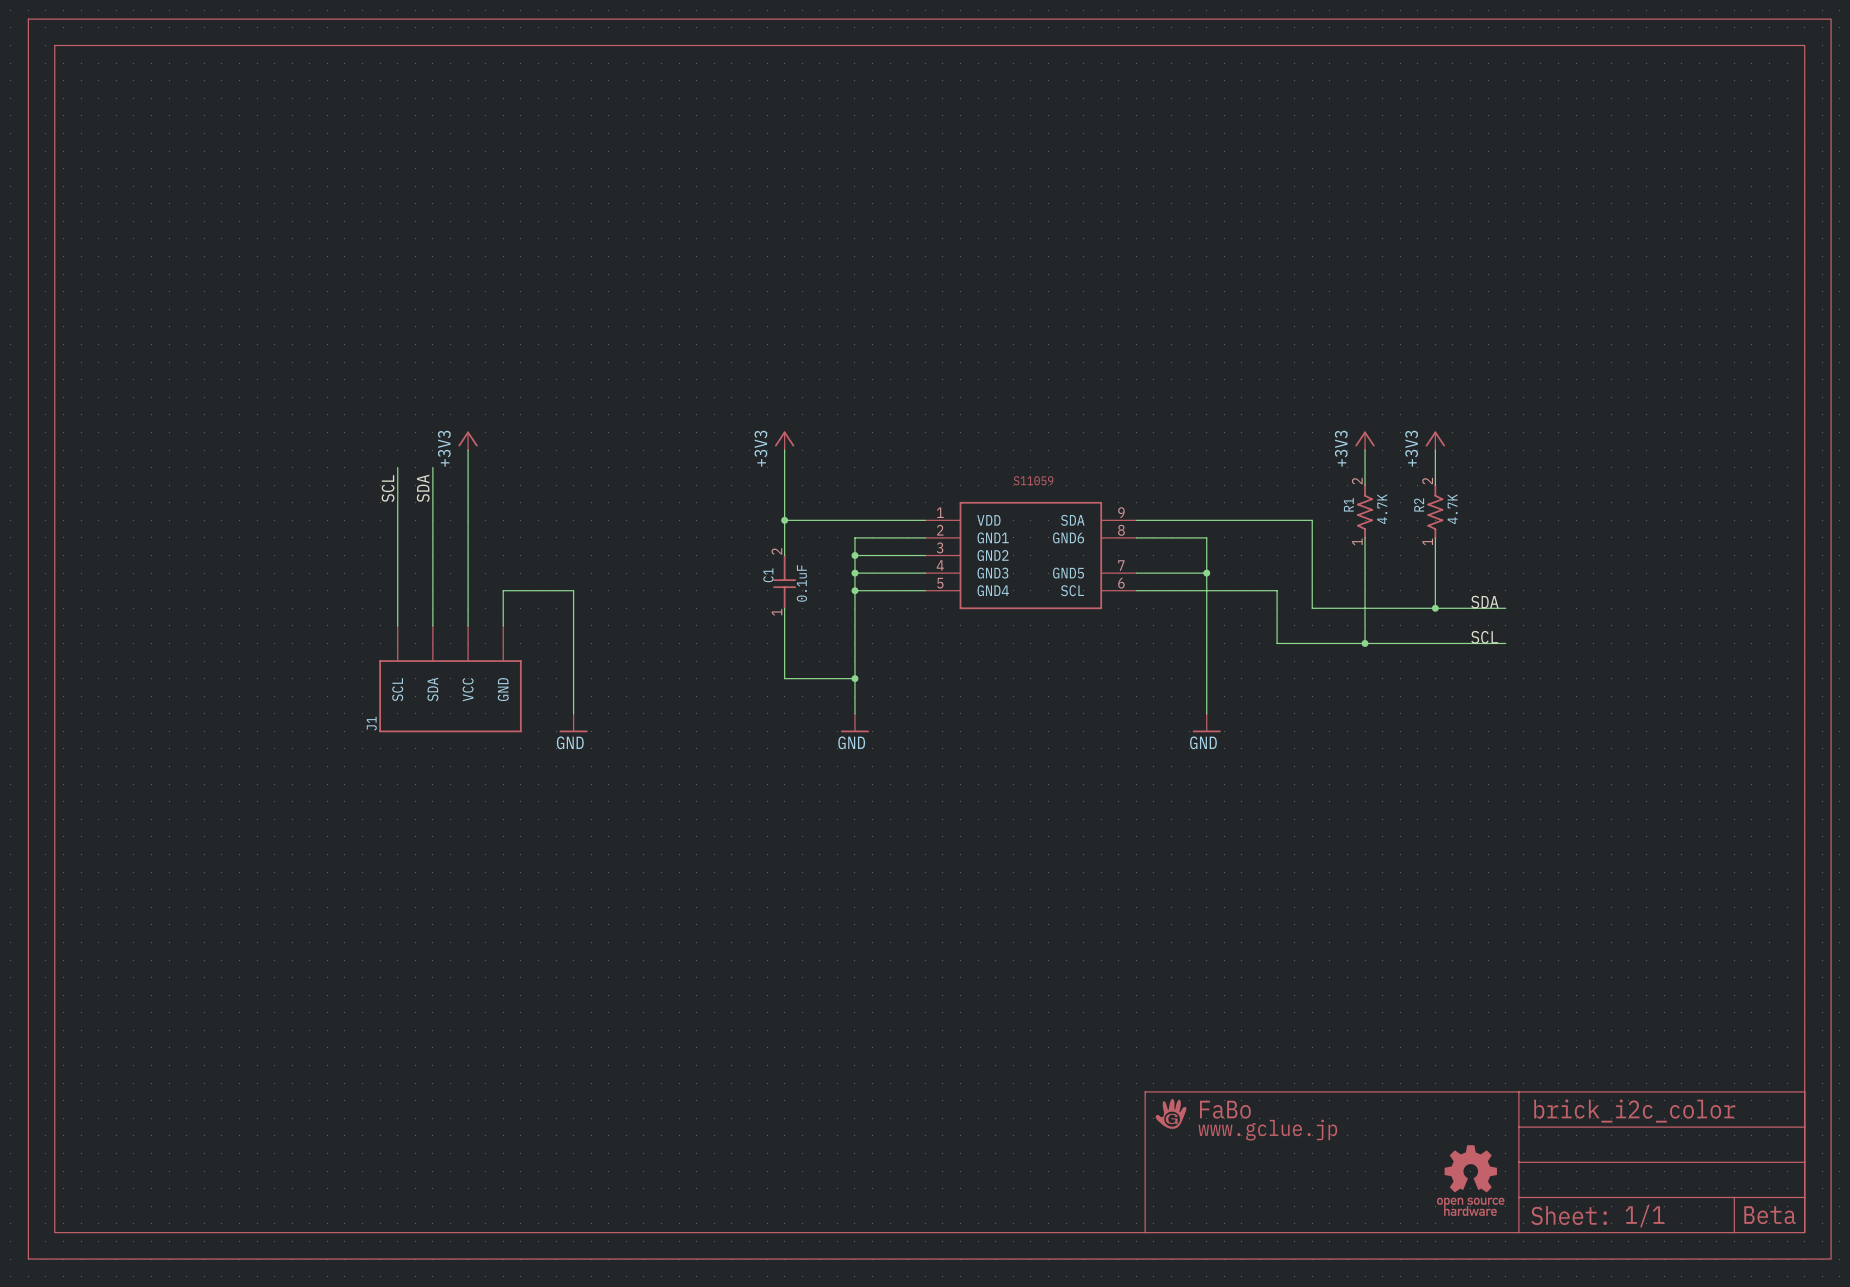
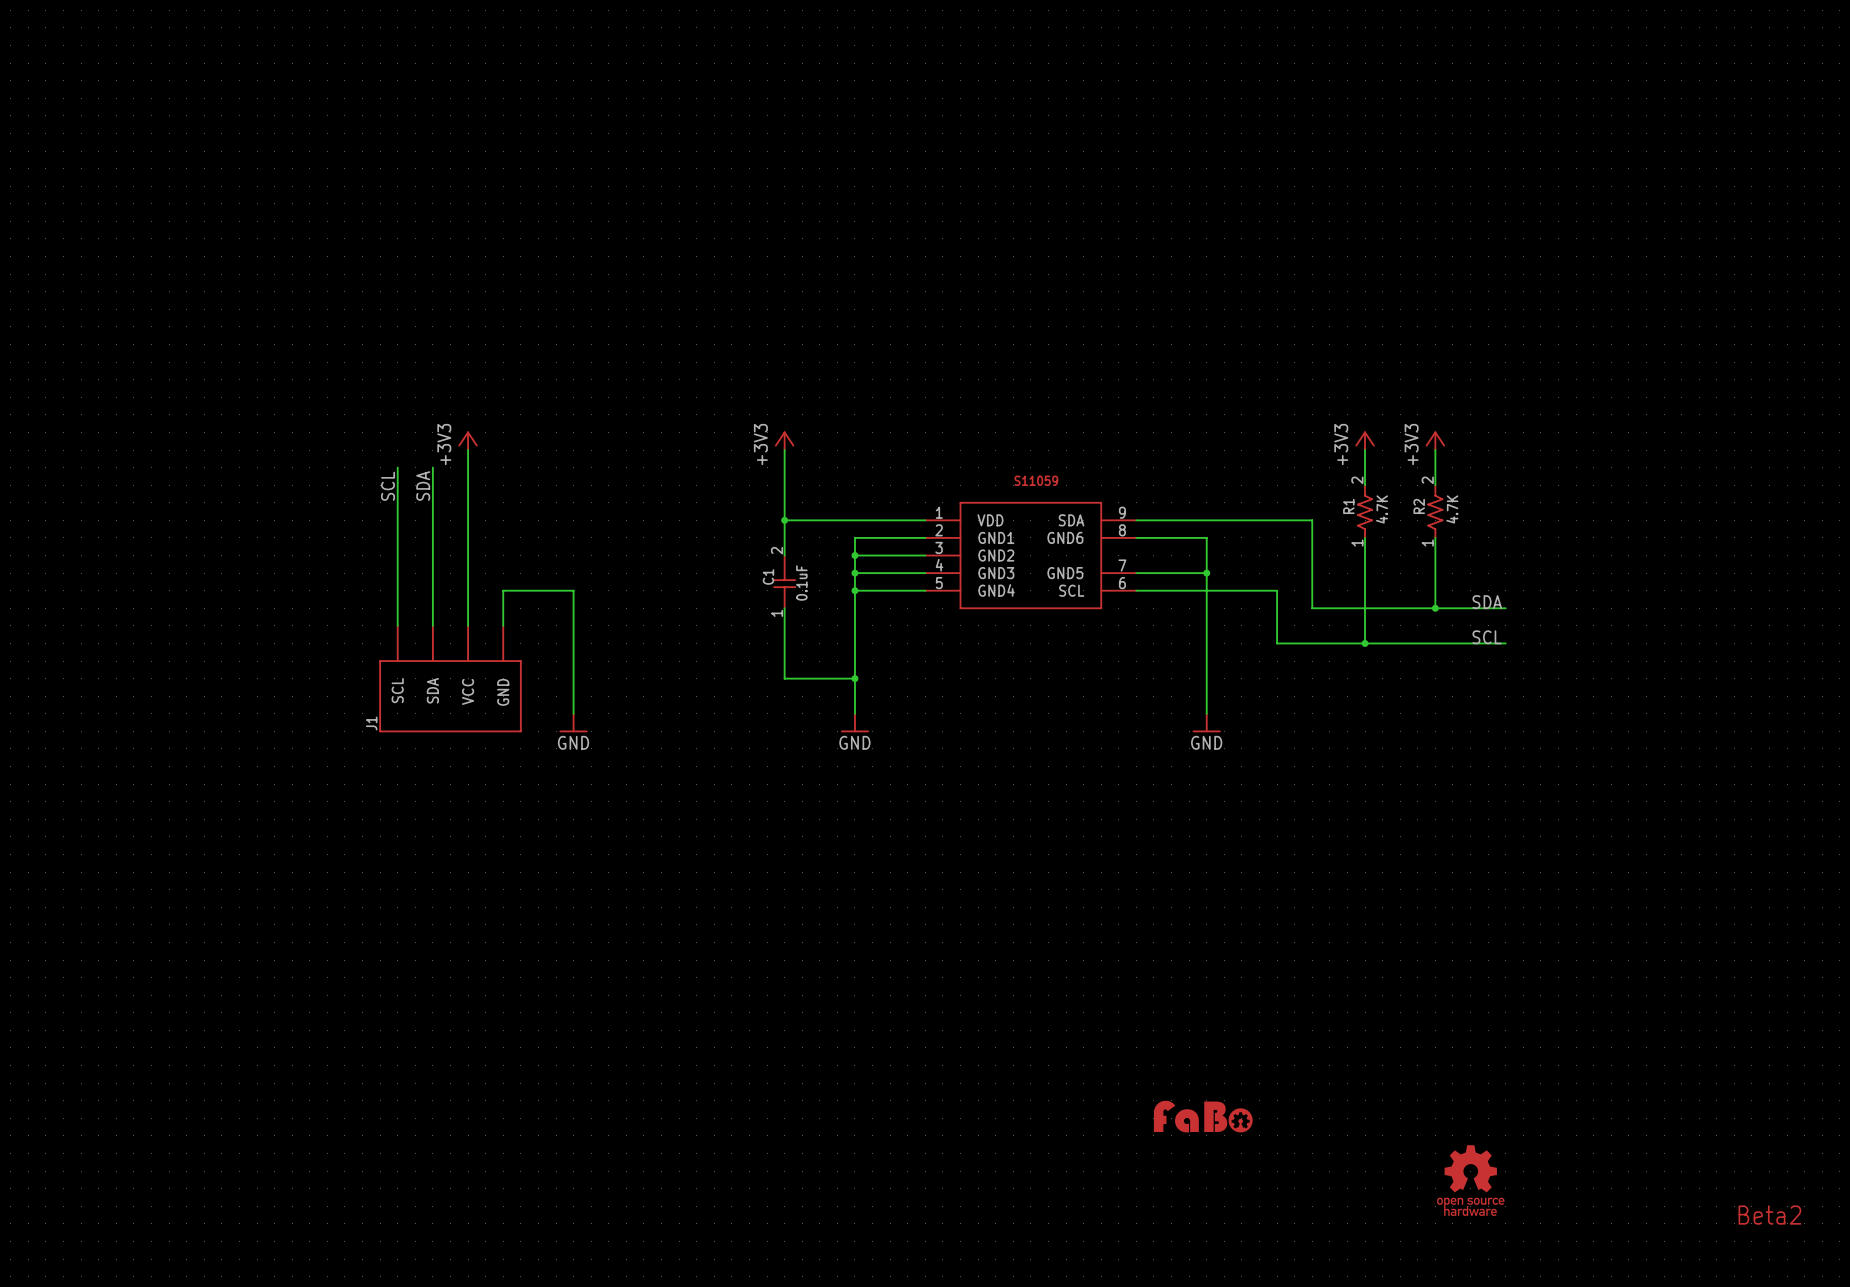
part: (929, 639) -> none
part: none -> (1203, 1116)
text: Beta (1769, 1215) -> Beta2 (1769, 1215)

